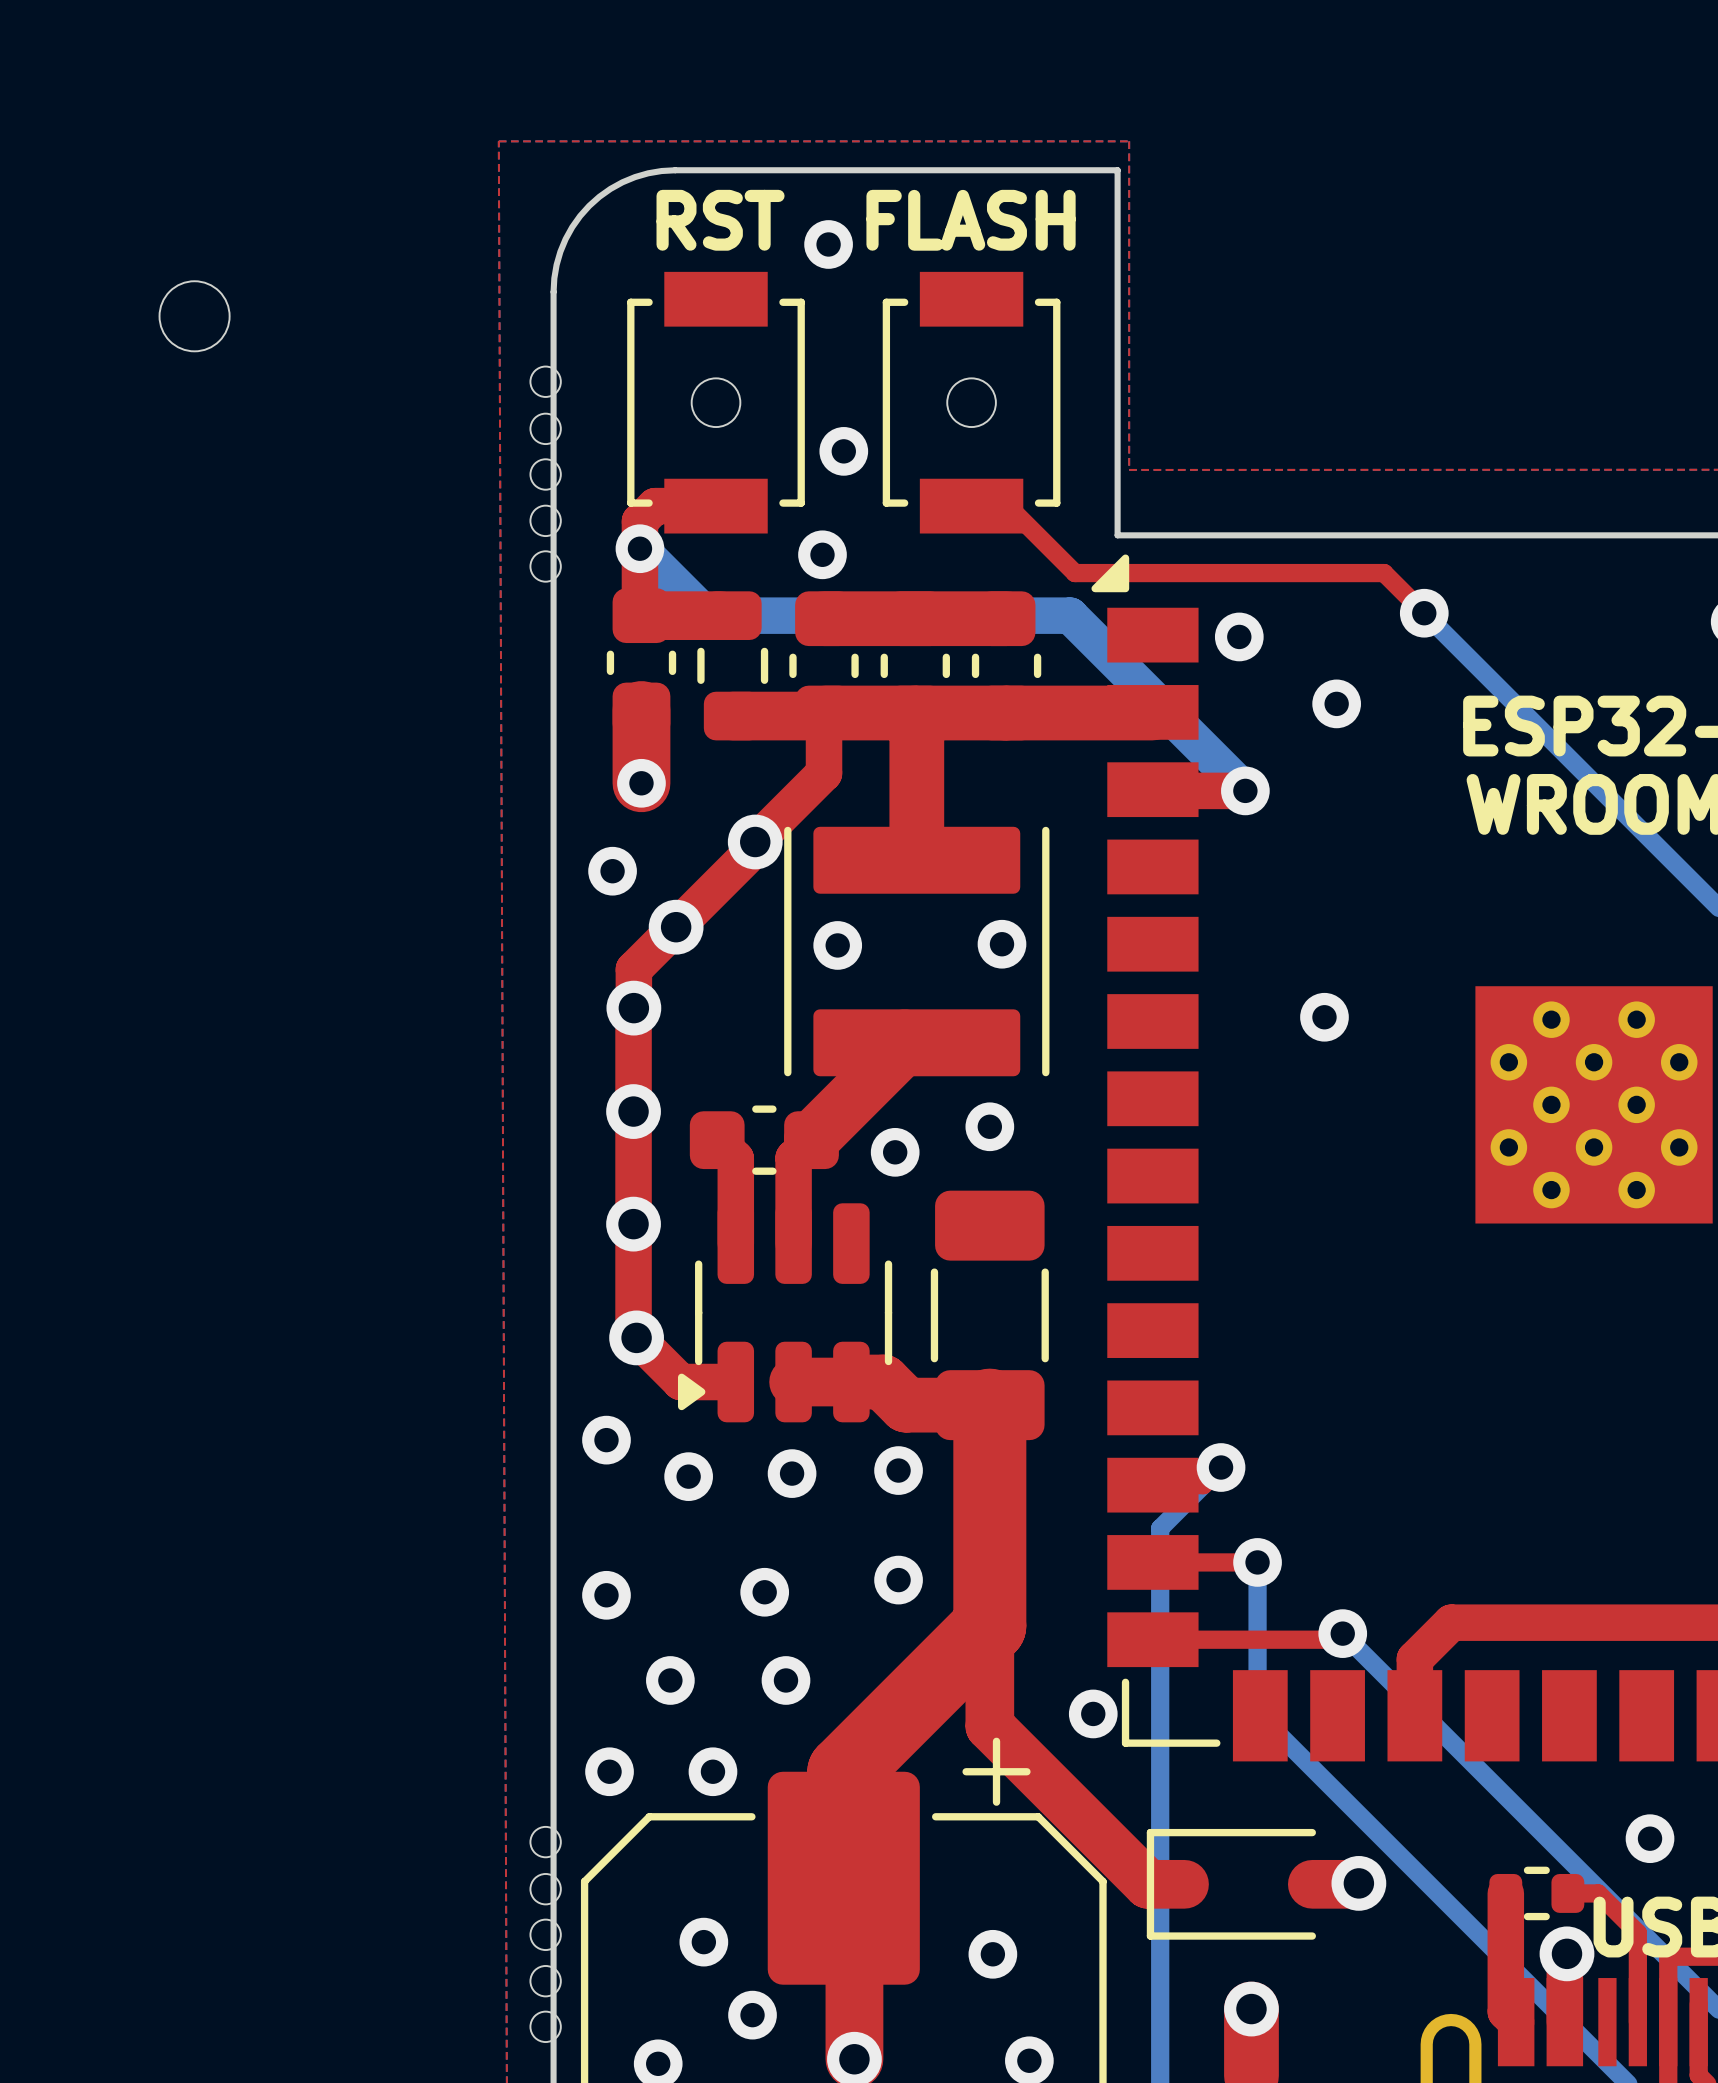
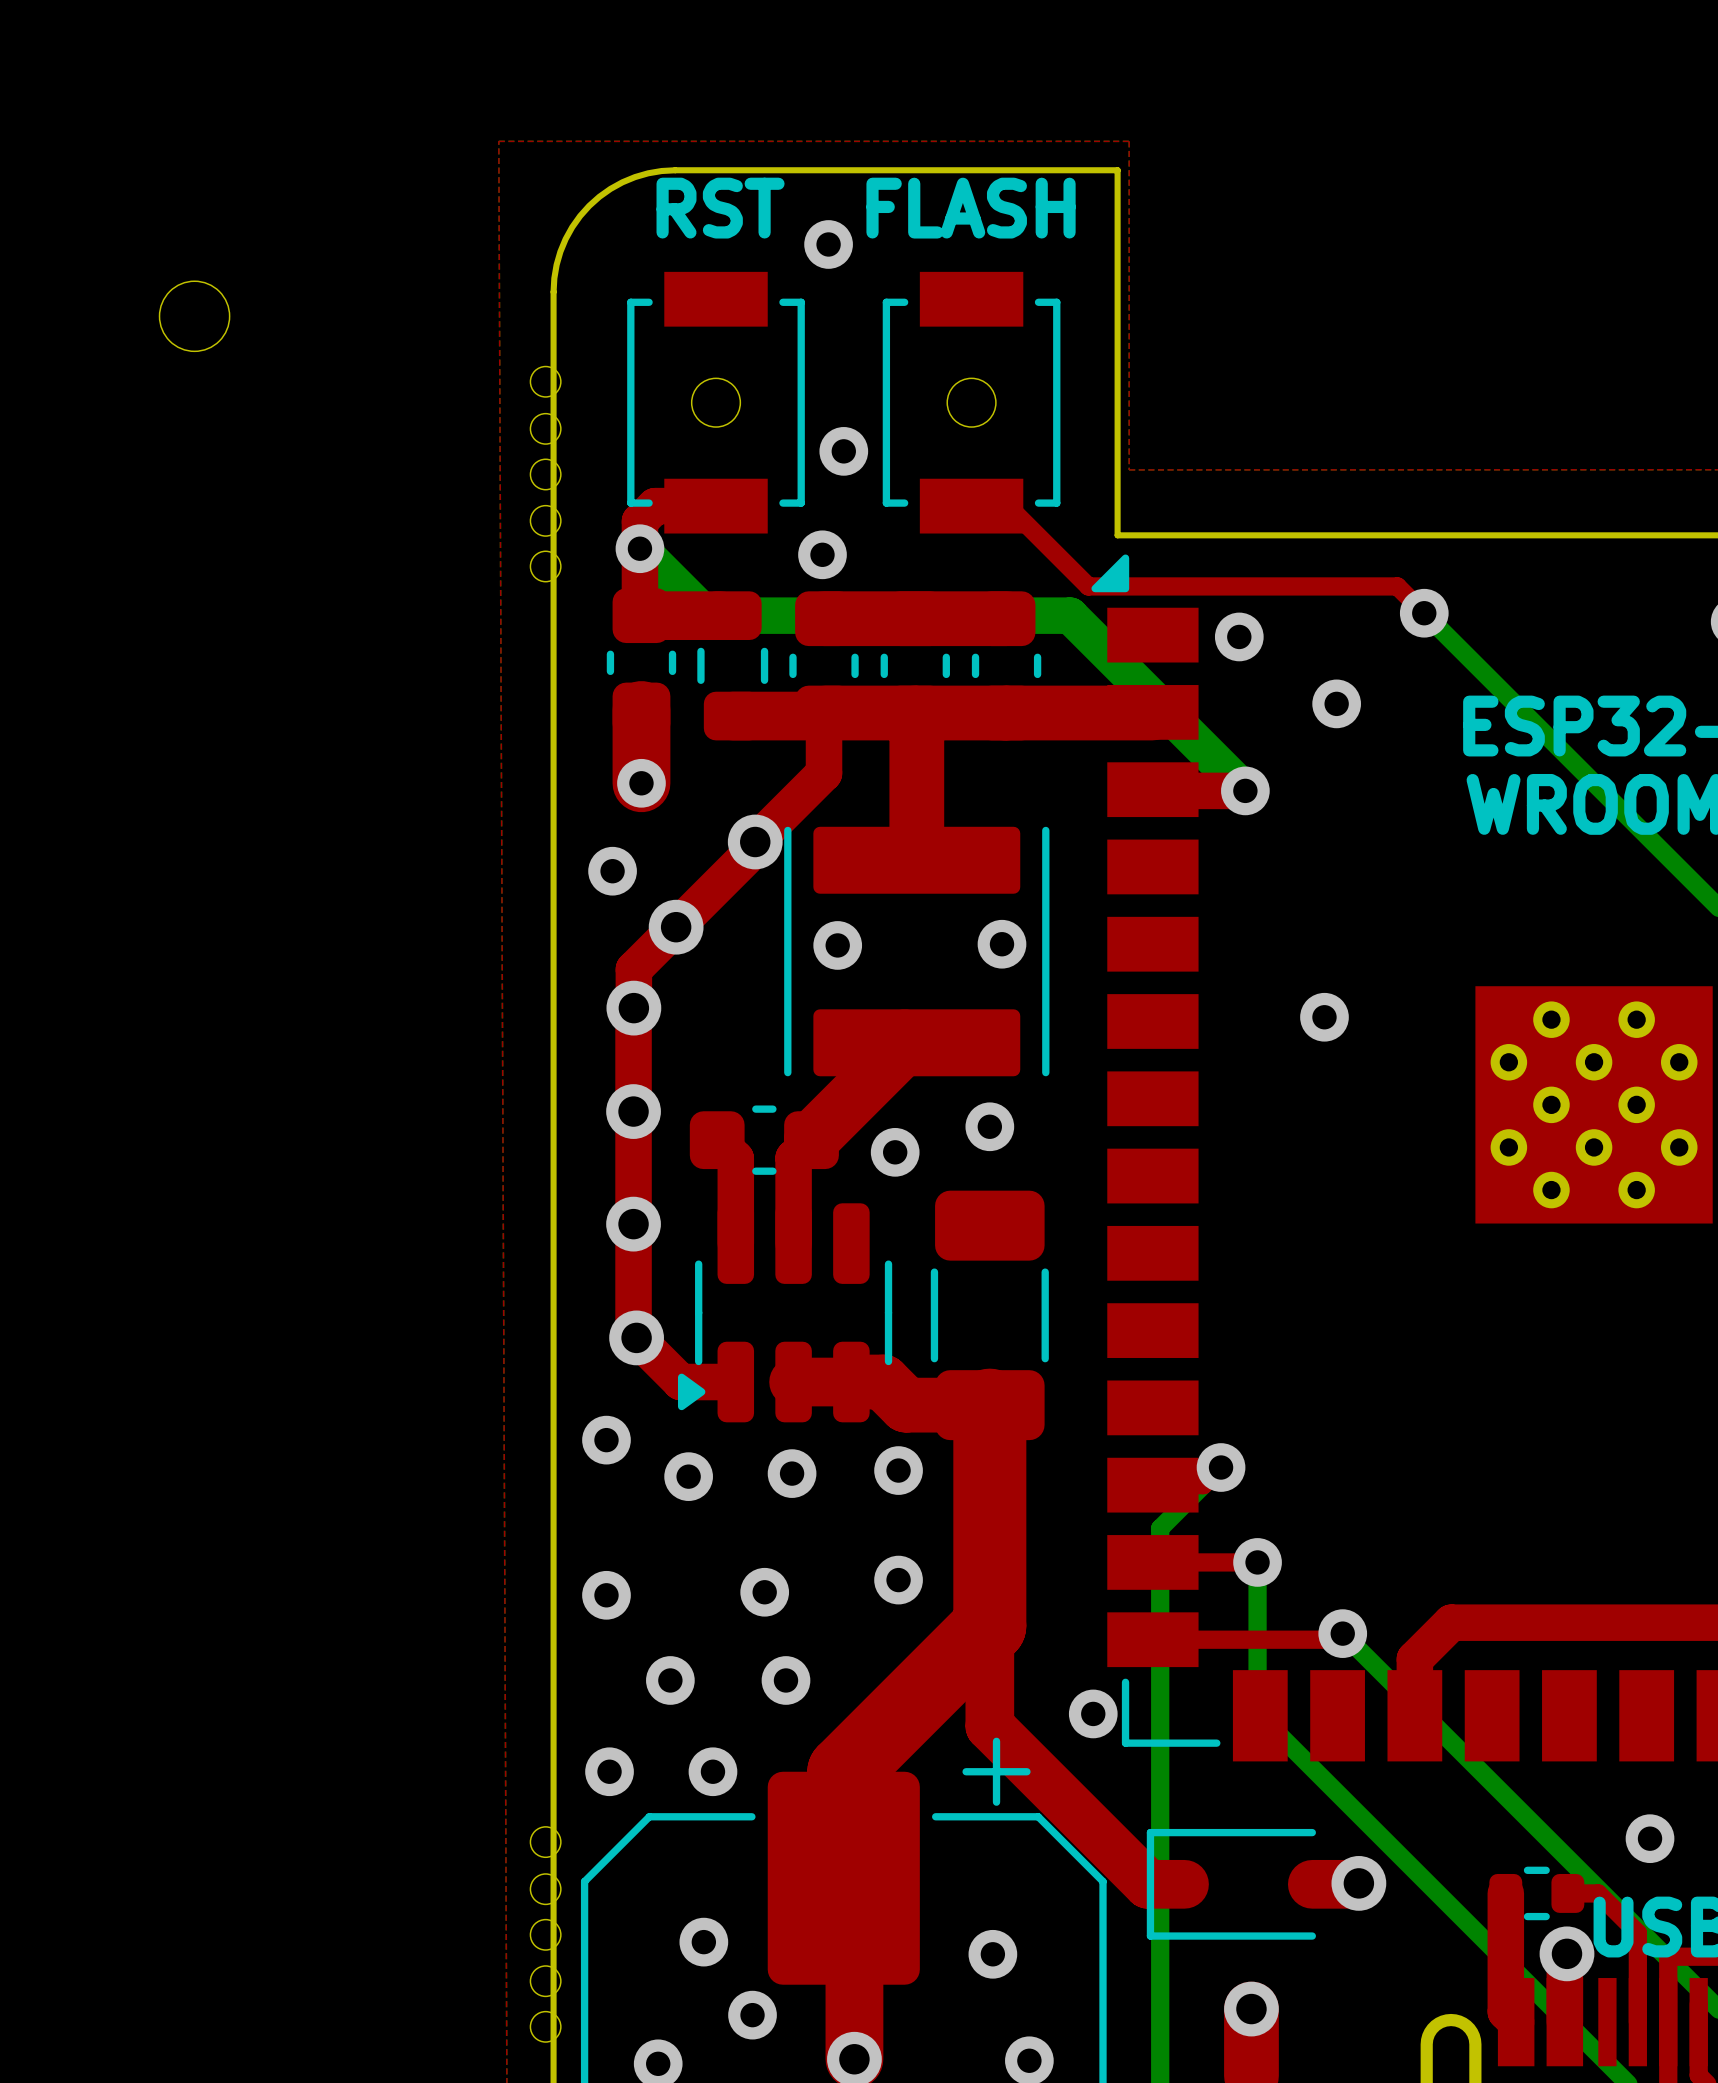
text position: RST (720, 220) -> RST (720, 208)
text position: FLASH (971, 220) -> FLASH (971, 208)
top track: (1075, 573) (1384, 573) (1397, 586) -> (1075, 573) (1088, 586) (1397, 586)

